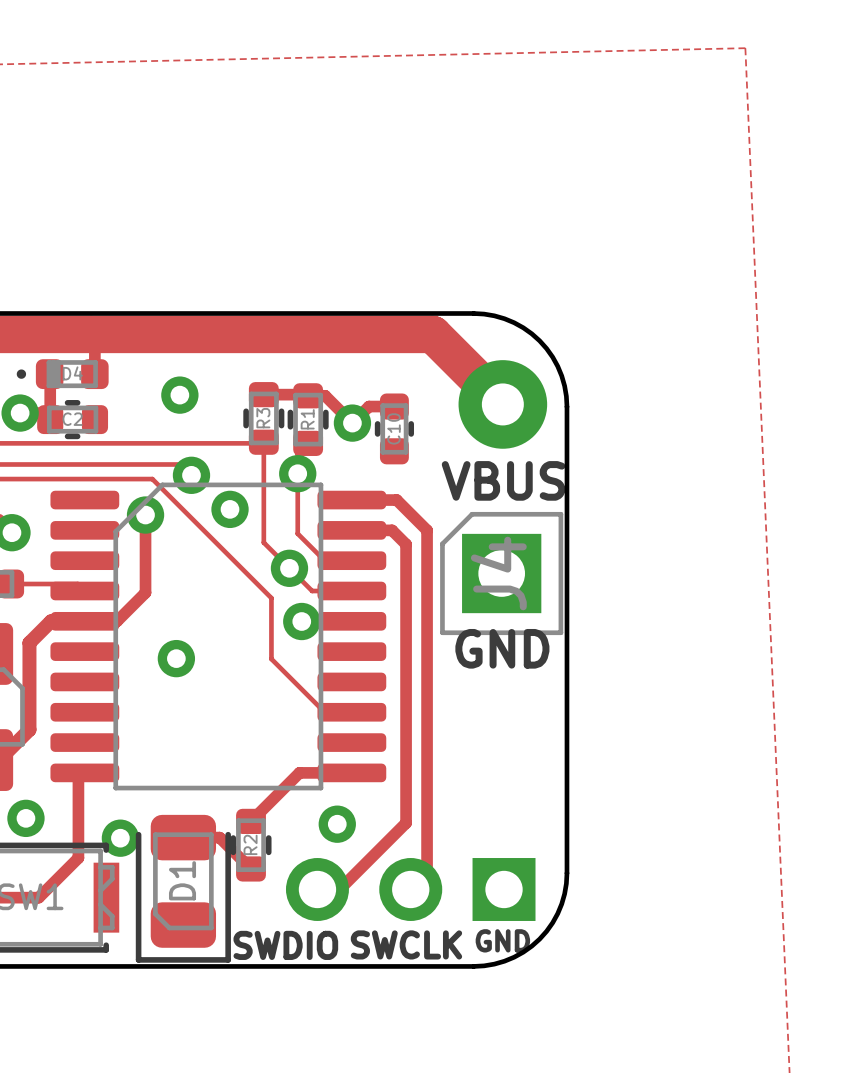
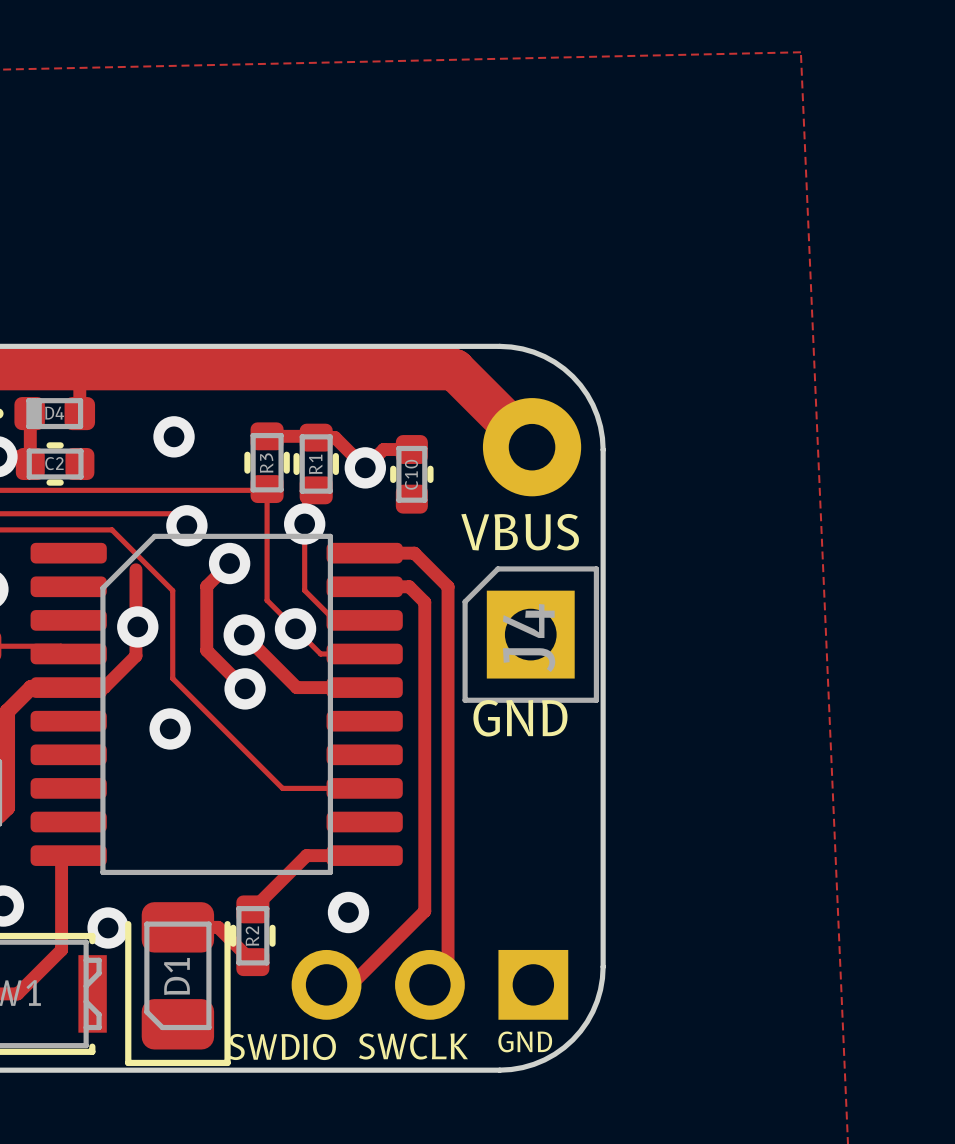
track: (123, 479) (152, 479) (271, 598) (271, 659) (324, 712) -> (111, 529) (172, 590) (172, 678) (282, 788) (334, 788)
track: none -> (229, 563) (206, 586) (206, 650) (245, 688)
via position: (145, 515) -> (137, 626)
track: none -> (244, 635) (296, 687) (309, 687)
via: none -> (244, 635)
via: (301, 621) -> none
via: none -> (245, 688)

